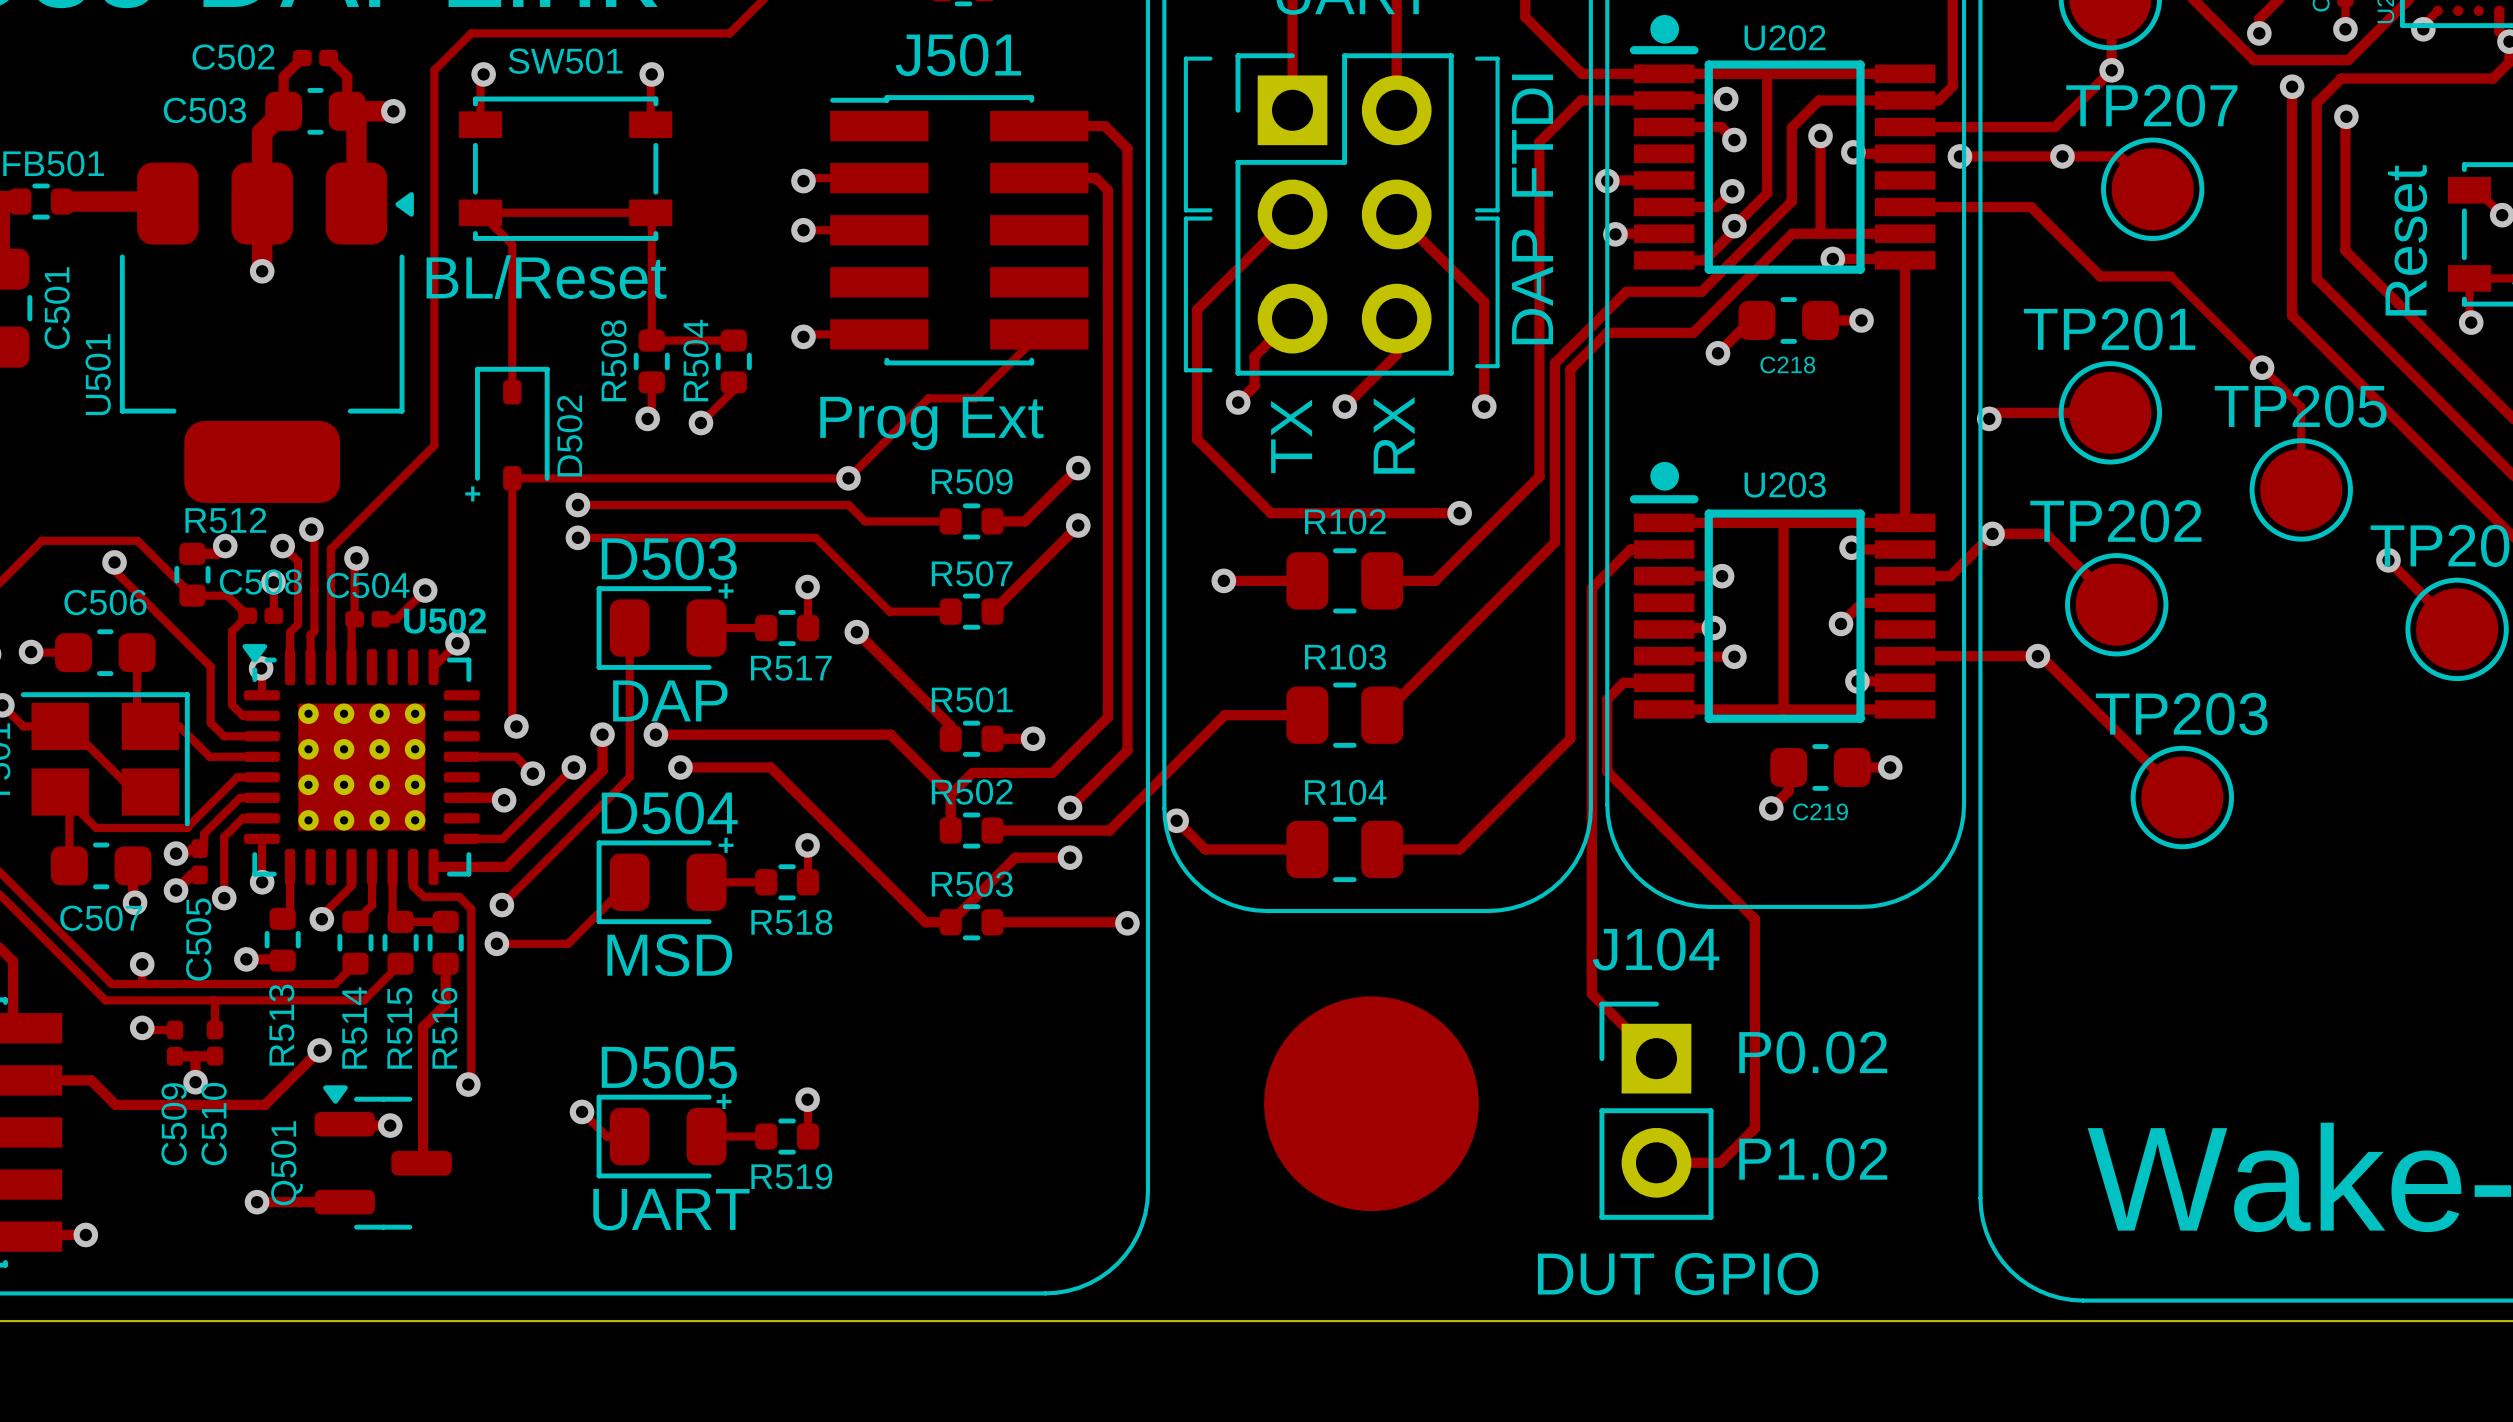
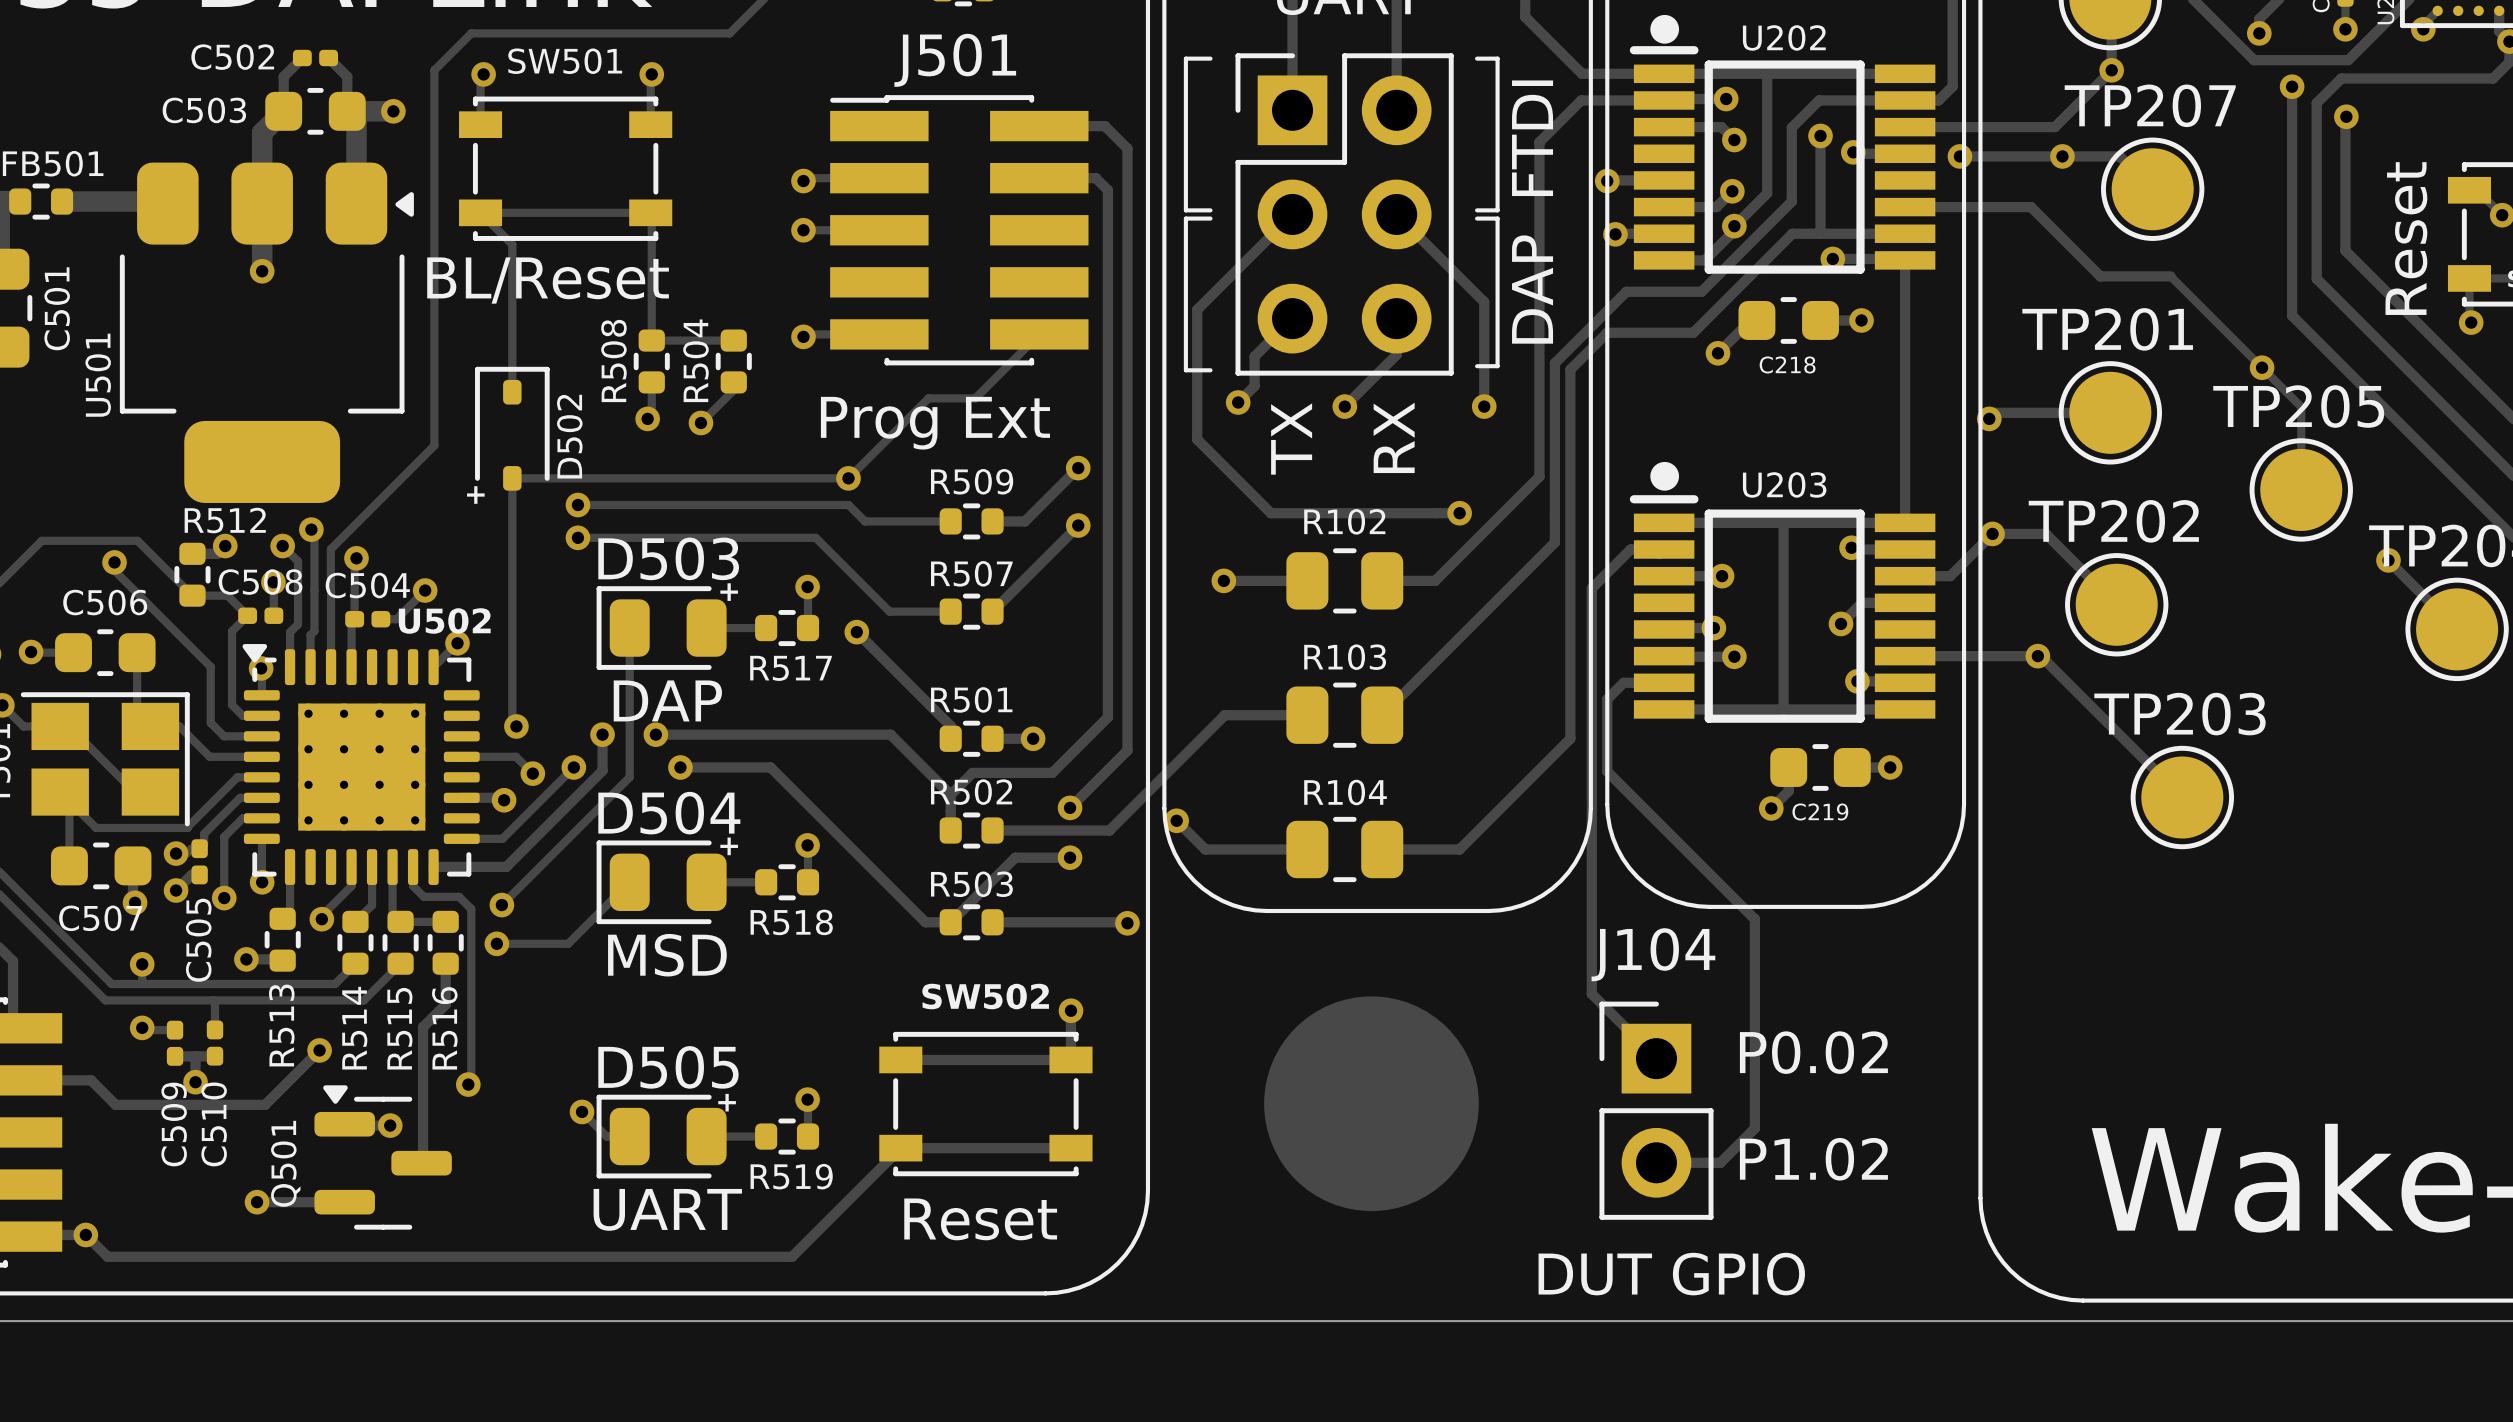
track: none -> (1070, 1010) (1070, 1059) (900, 1059)
via: none -> (1070, 1010)
SW502: none -> (985, 1104)
track: none -> (1070, 1148) (900, 1148) (792, 1256) (107, 1256) (85, 1234)
text: none -> Reset (980, 1219)

